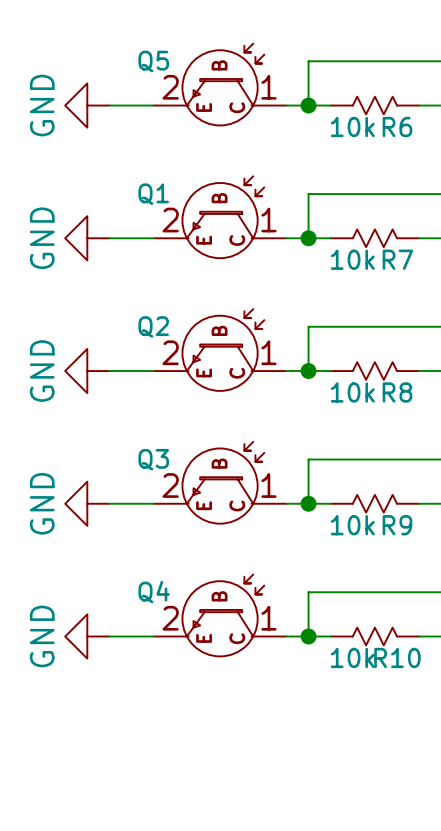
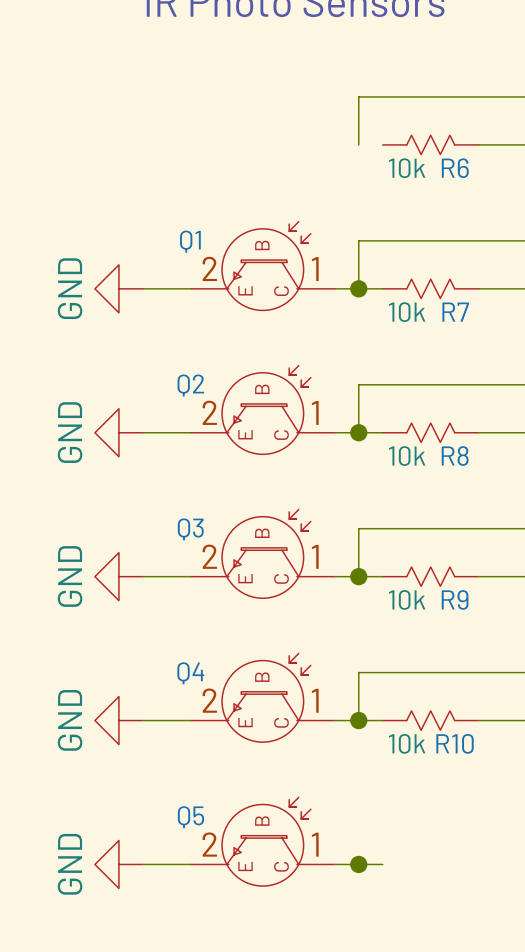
Q5 position: (220, 84) -> (262, 841)
power symbol: GND (87, 105) -> none
wire: (109, 105) (153, 105) -> none
wire: (286, 105) (330, 105) -> none
junction: (308, 105) -> none
power symbol: none -> GND (118, 864)
wire: none -> (142, 864) (190, 864)
wire: none -> (334, 864) (382, 864)
junction: none -> (358, 864)

